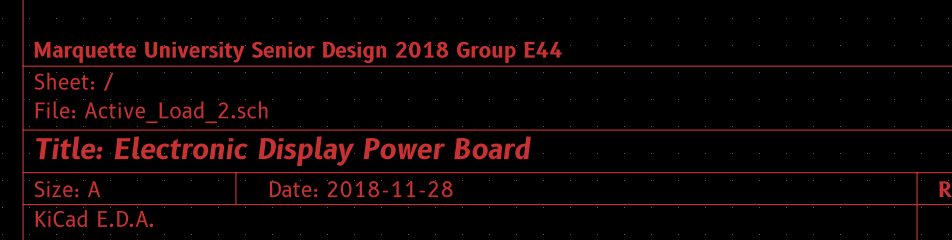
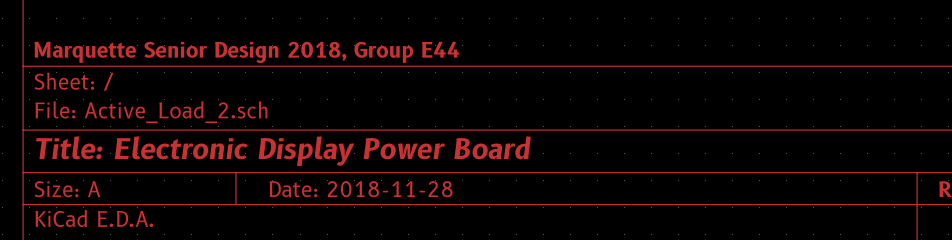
title block: Marquette University Senior Design 2018 Group E44 (298, 52) -> Marquette Senior Design 2018, Group E44 (246, 52)

